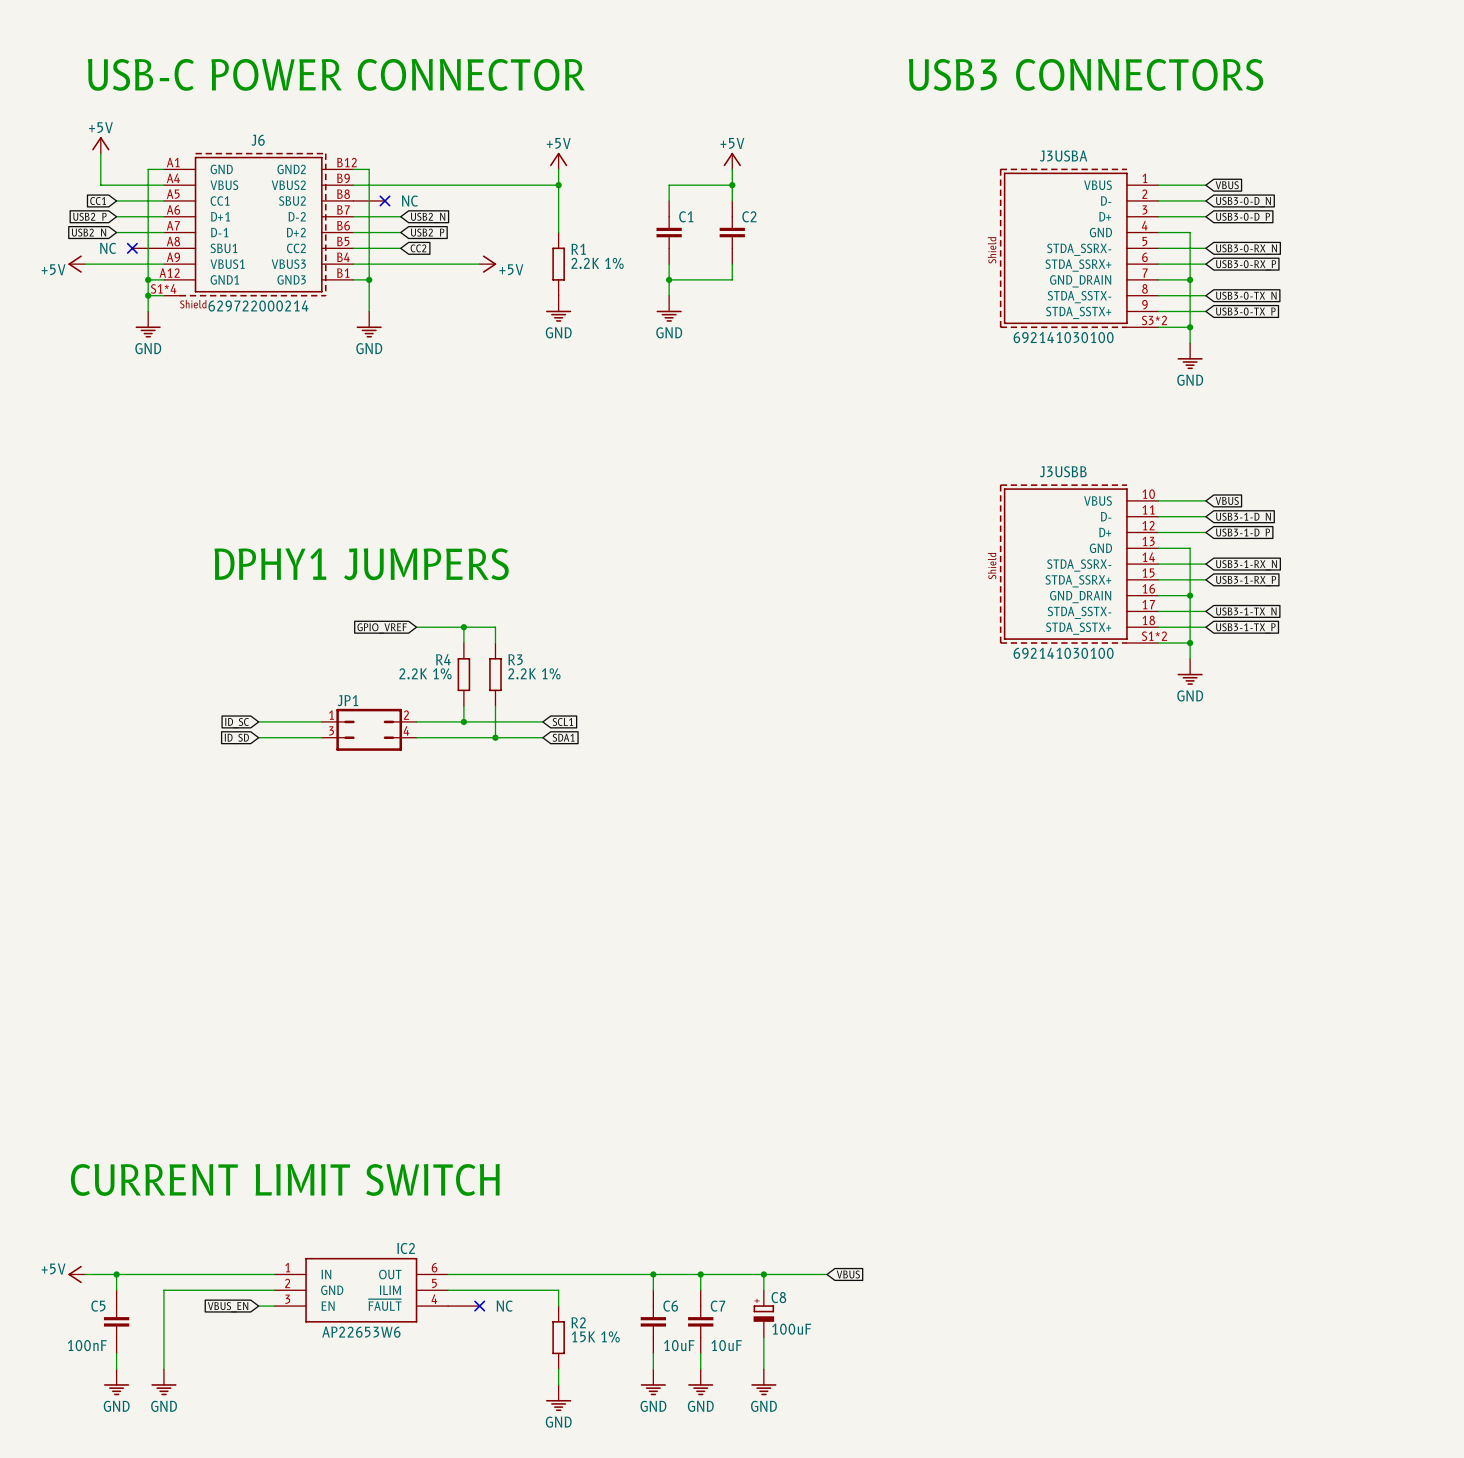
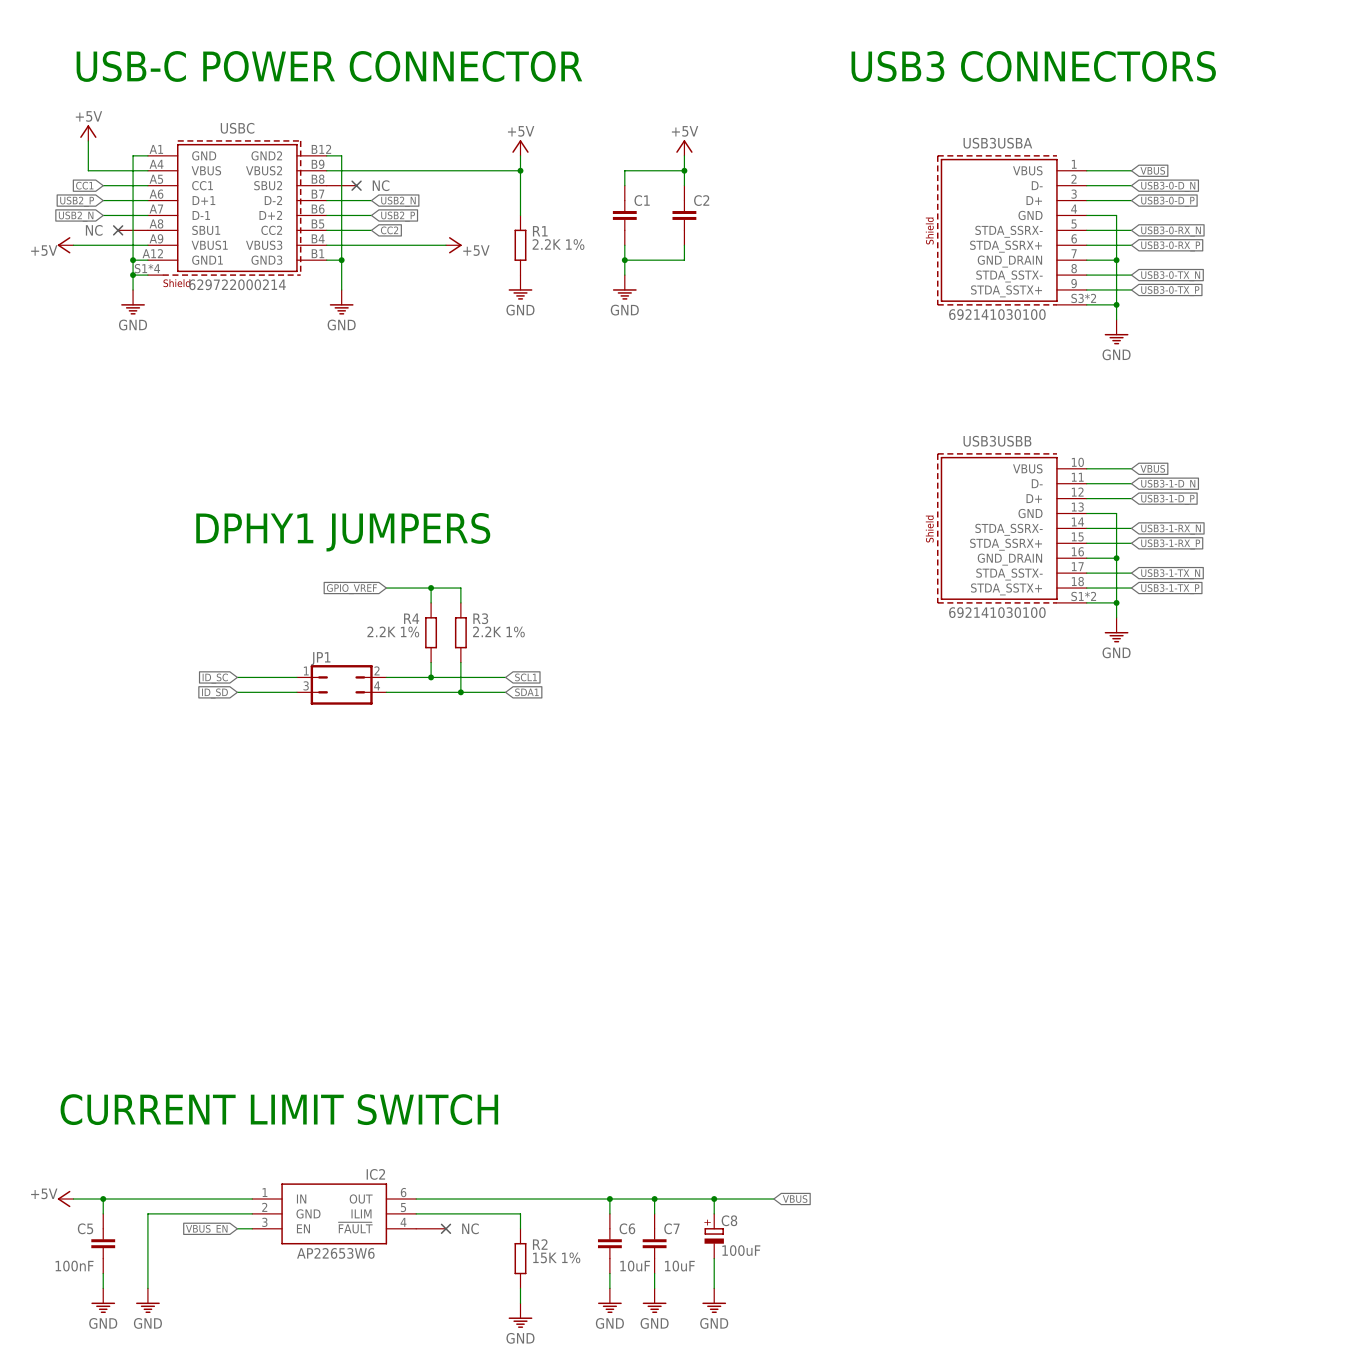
J6 name: J6 (258, 140) -> USBC (237, 128)
J3USBA name: J3USBA (1063, 156) -> USB3USBA (997, 143)
J3USBB name: J3USBB (1063, 471) -> USB3USBB (997, 441)

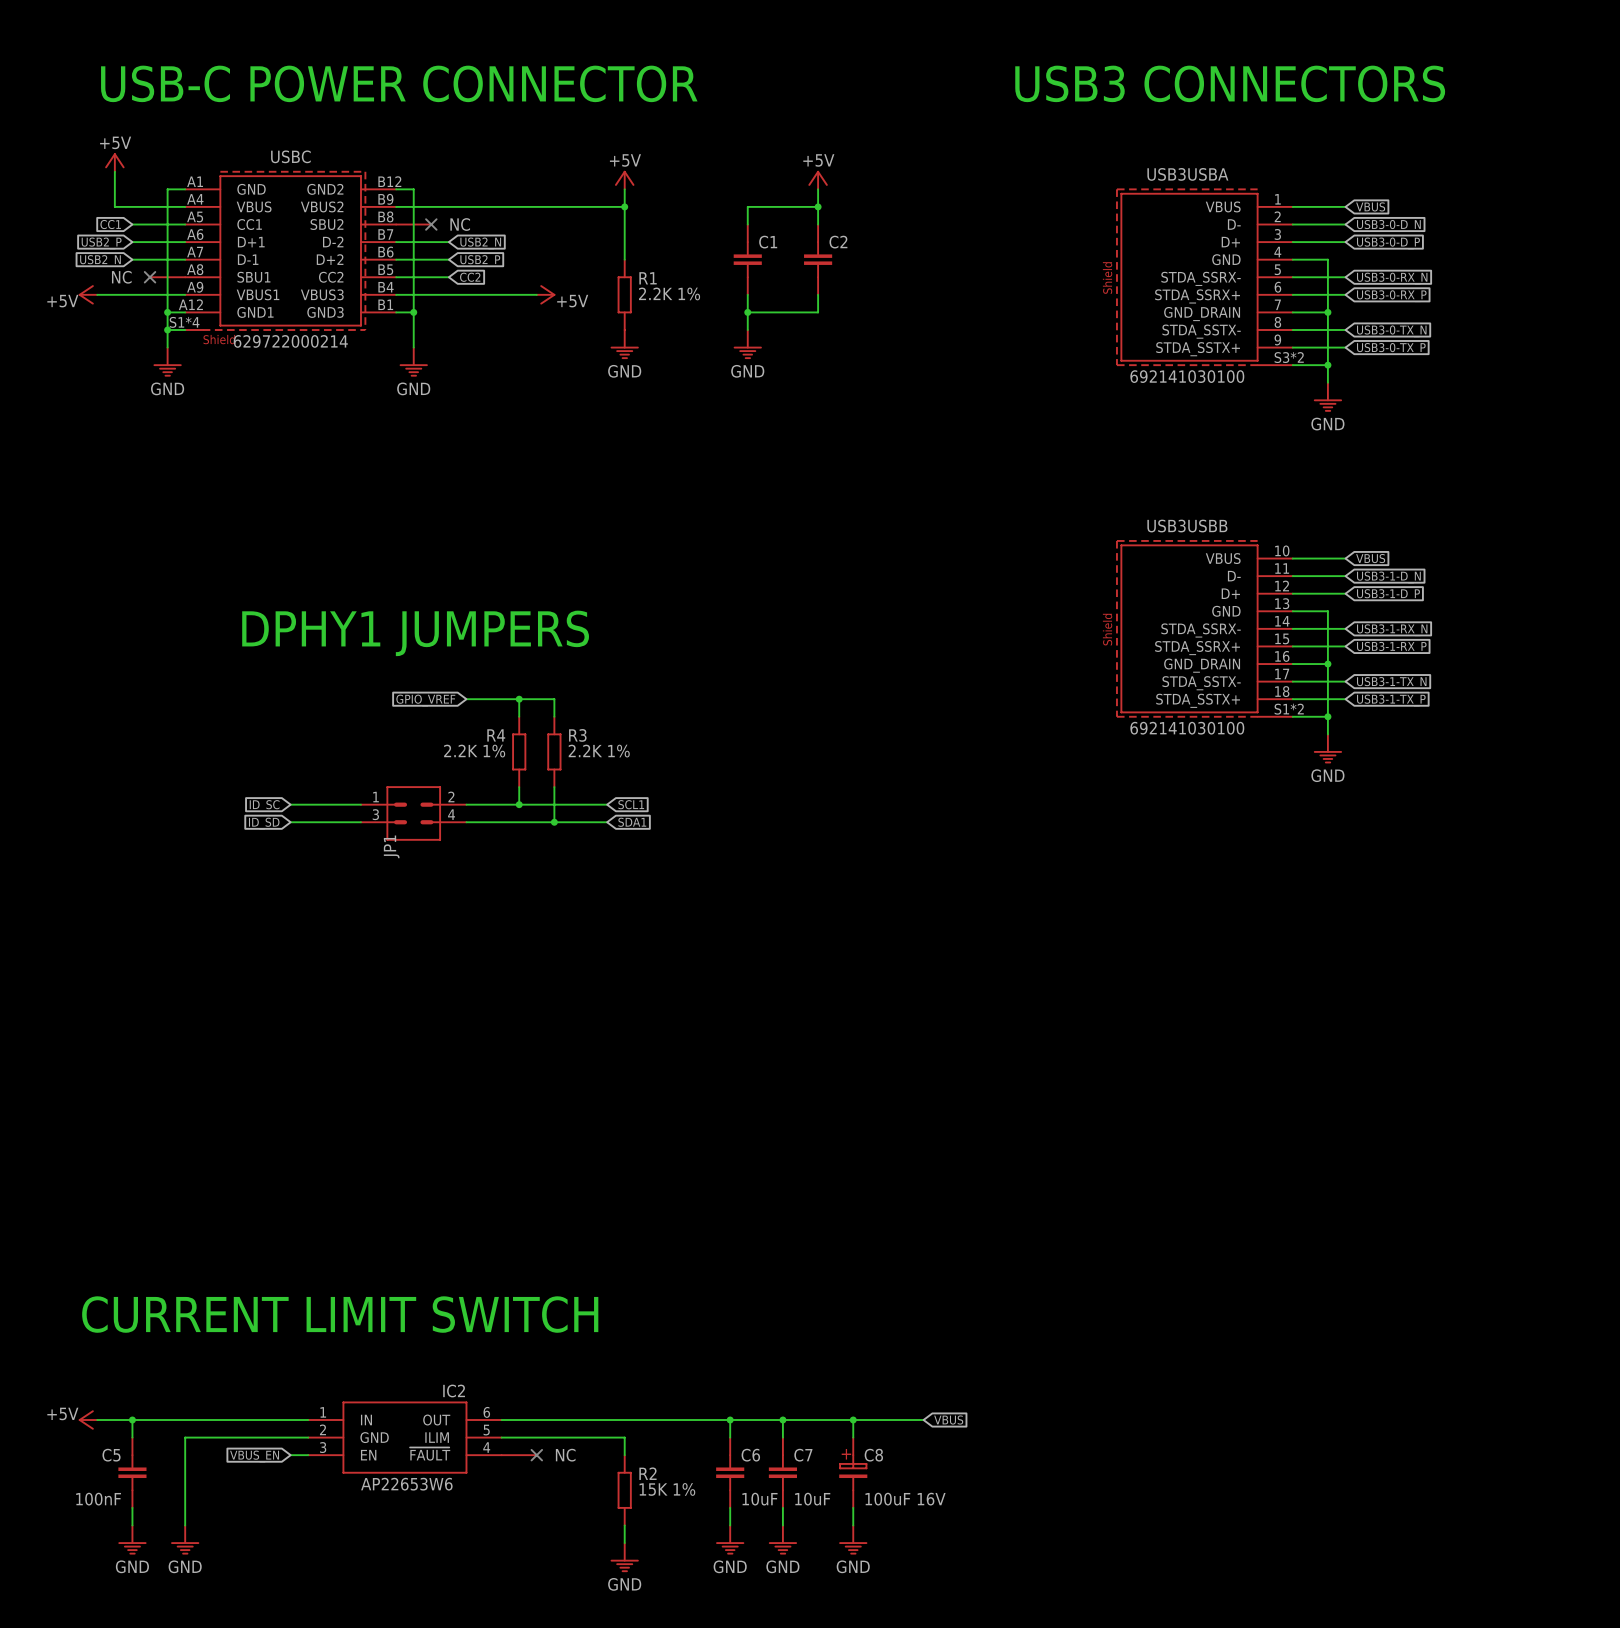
JP1 name position: JP1 (320, 658) -> JP1 (391, 846)
JP1 symbol: [296, 665, 387, 705] -> [360, 786, 467, 841]
C8 symbol: [704, 1213, 724, 1259] -> [839, 1437, 868, 1508]
C8 value: 100uF (741, 1250) -> 100uF 16V (905, 1499)

